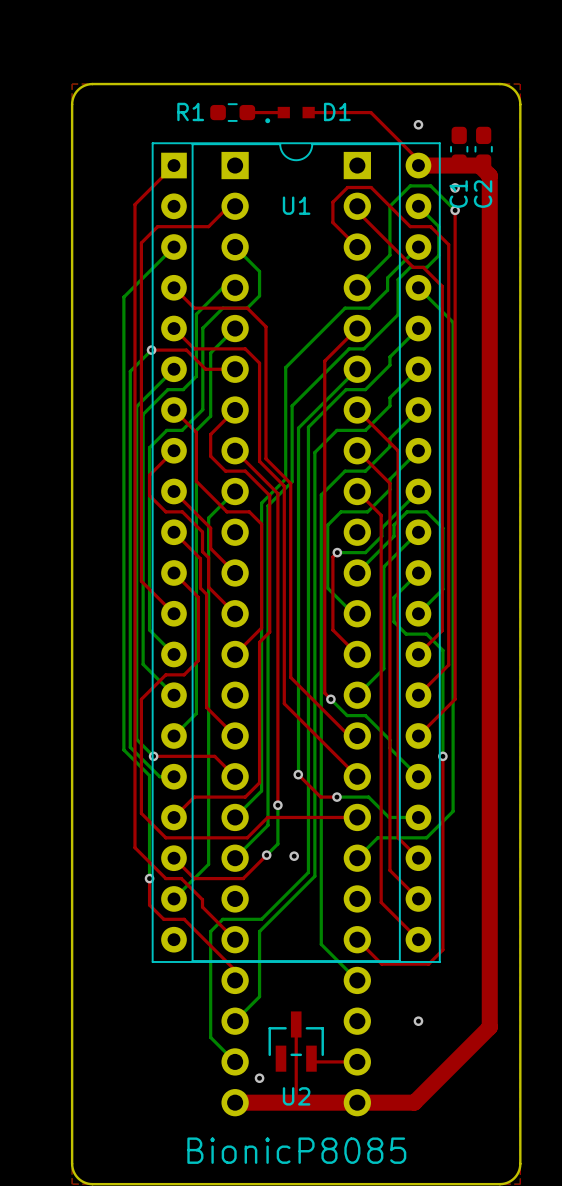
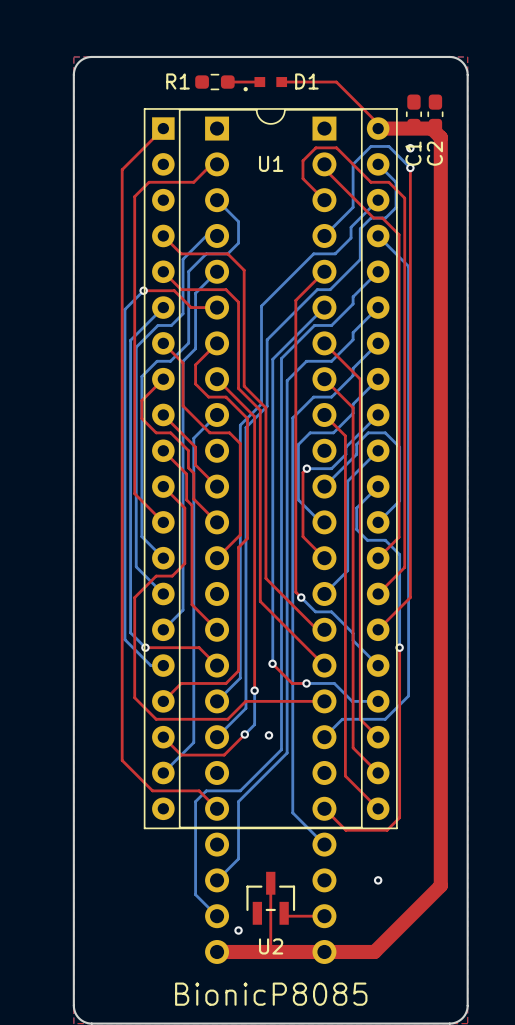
via: (418, 124) -> none
top track: (134, 204) (134, 847) (165, 878) (181, 878) (202, 899) (202, 907) (214, 919) -> (129, 162) (122, 169) (122, 760) (154, 790)
bottom track: (173, 247) (123, 297) (123, 749) (149, 775) (149, 878) -> none
top track: (149, 878) (149, 905) (163, 919) -> none
via: (149, 878) -> none
top track: (184, 919) (235, 970) (235, 980) -> (172, 790) (199, 790)

